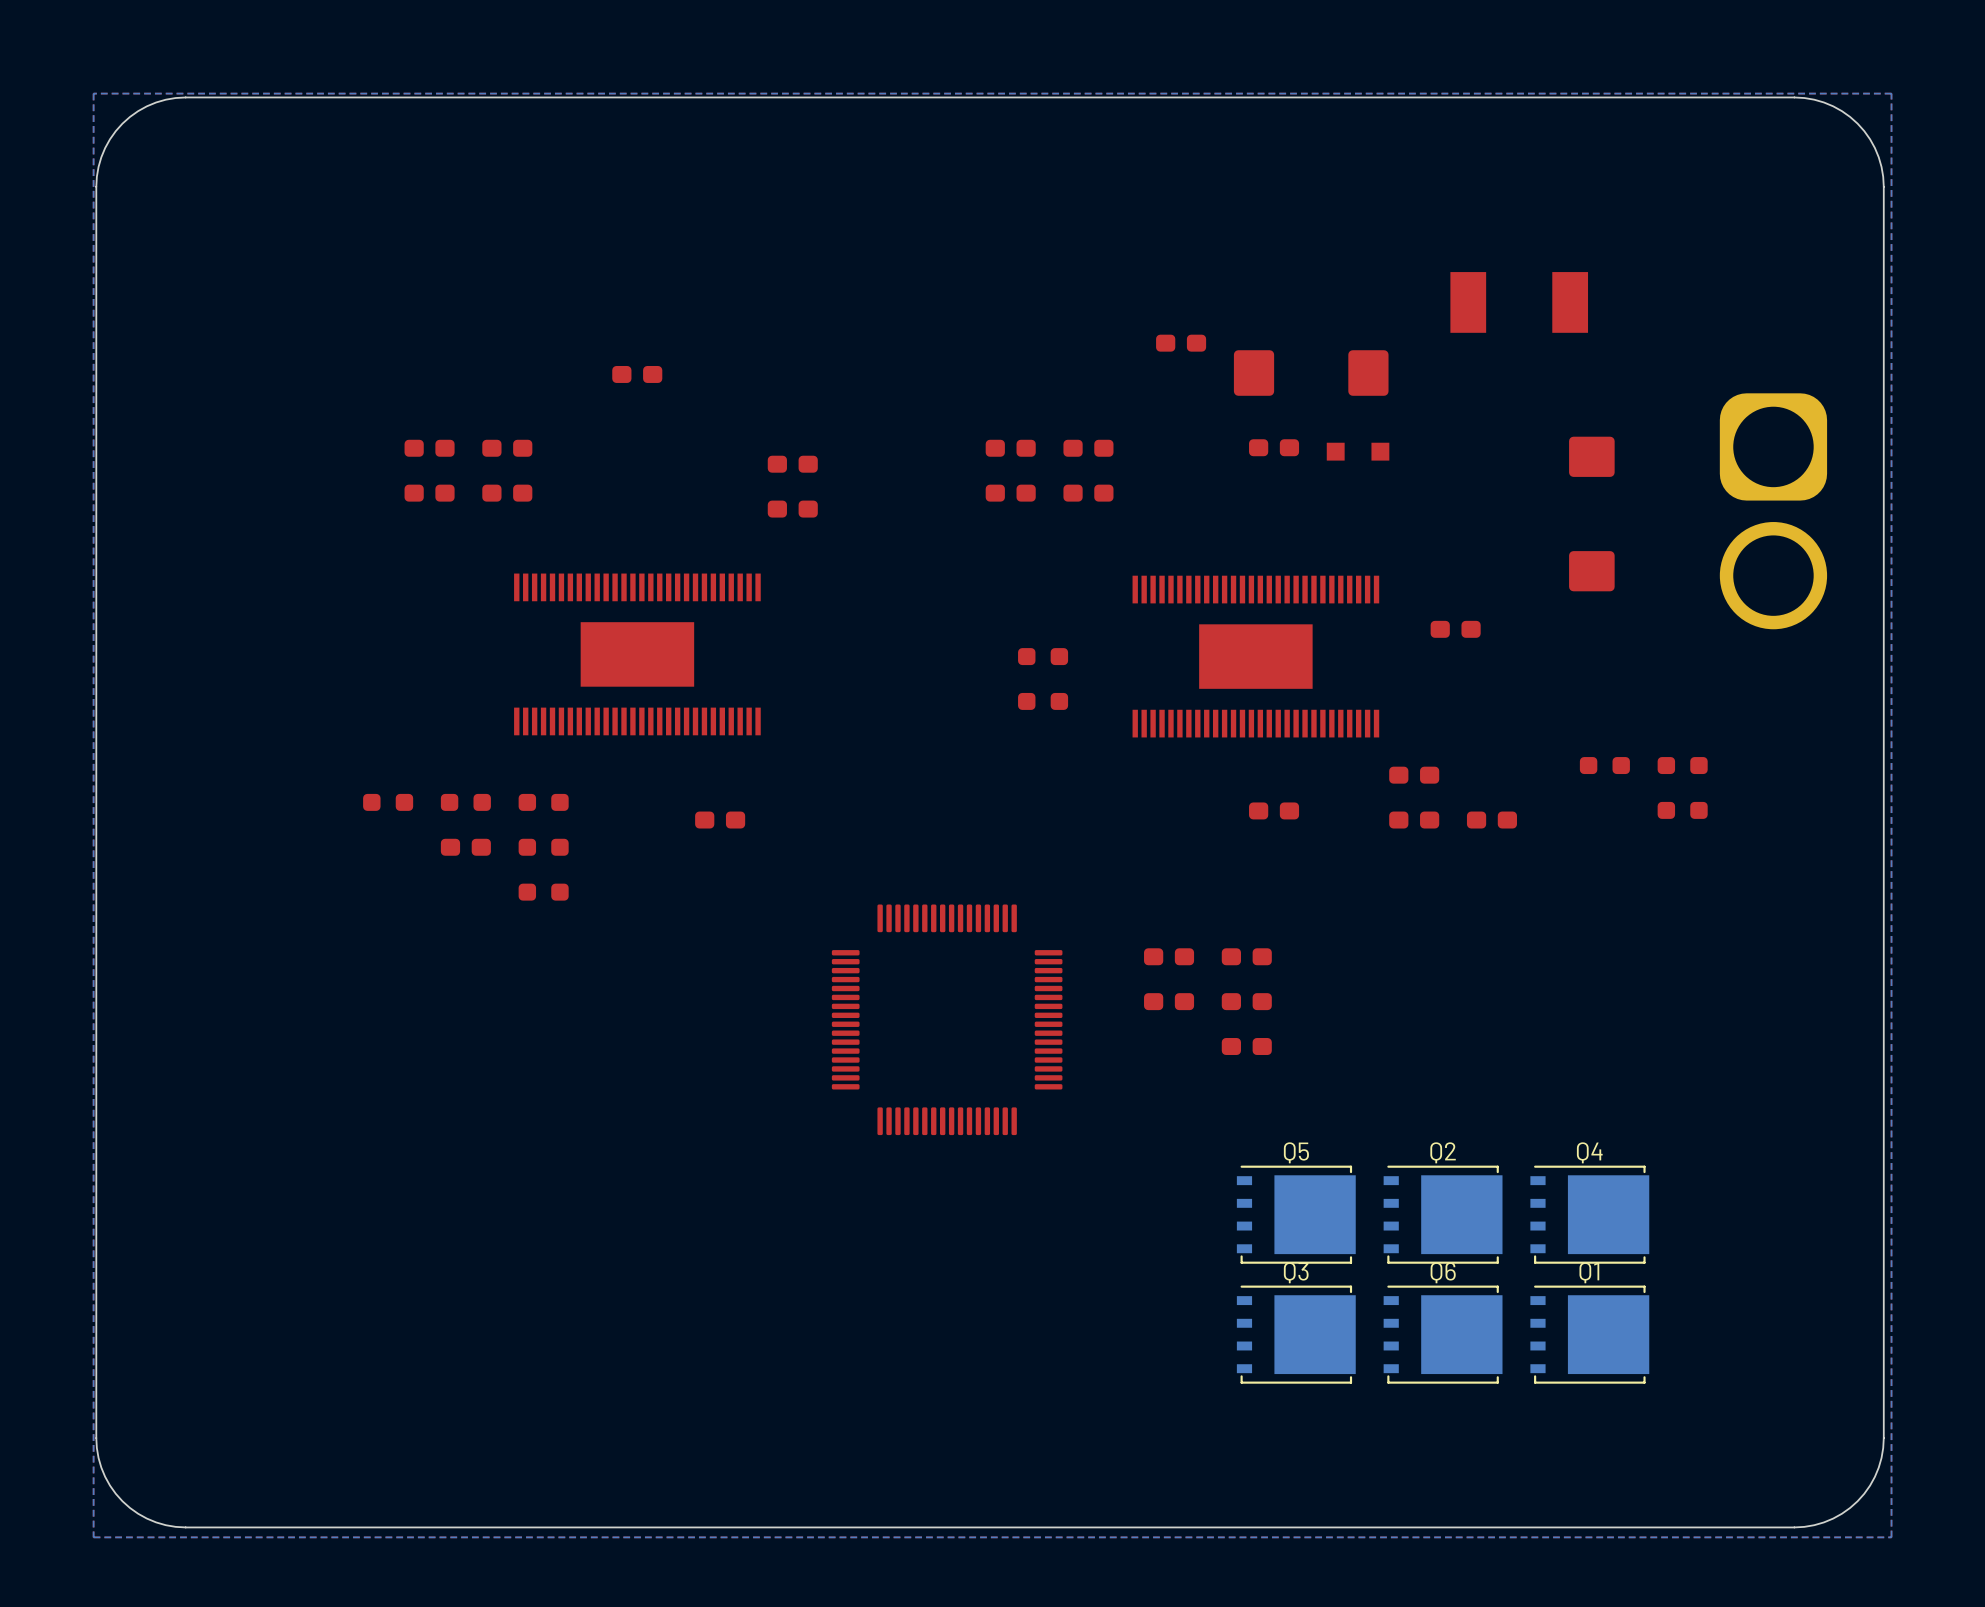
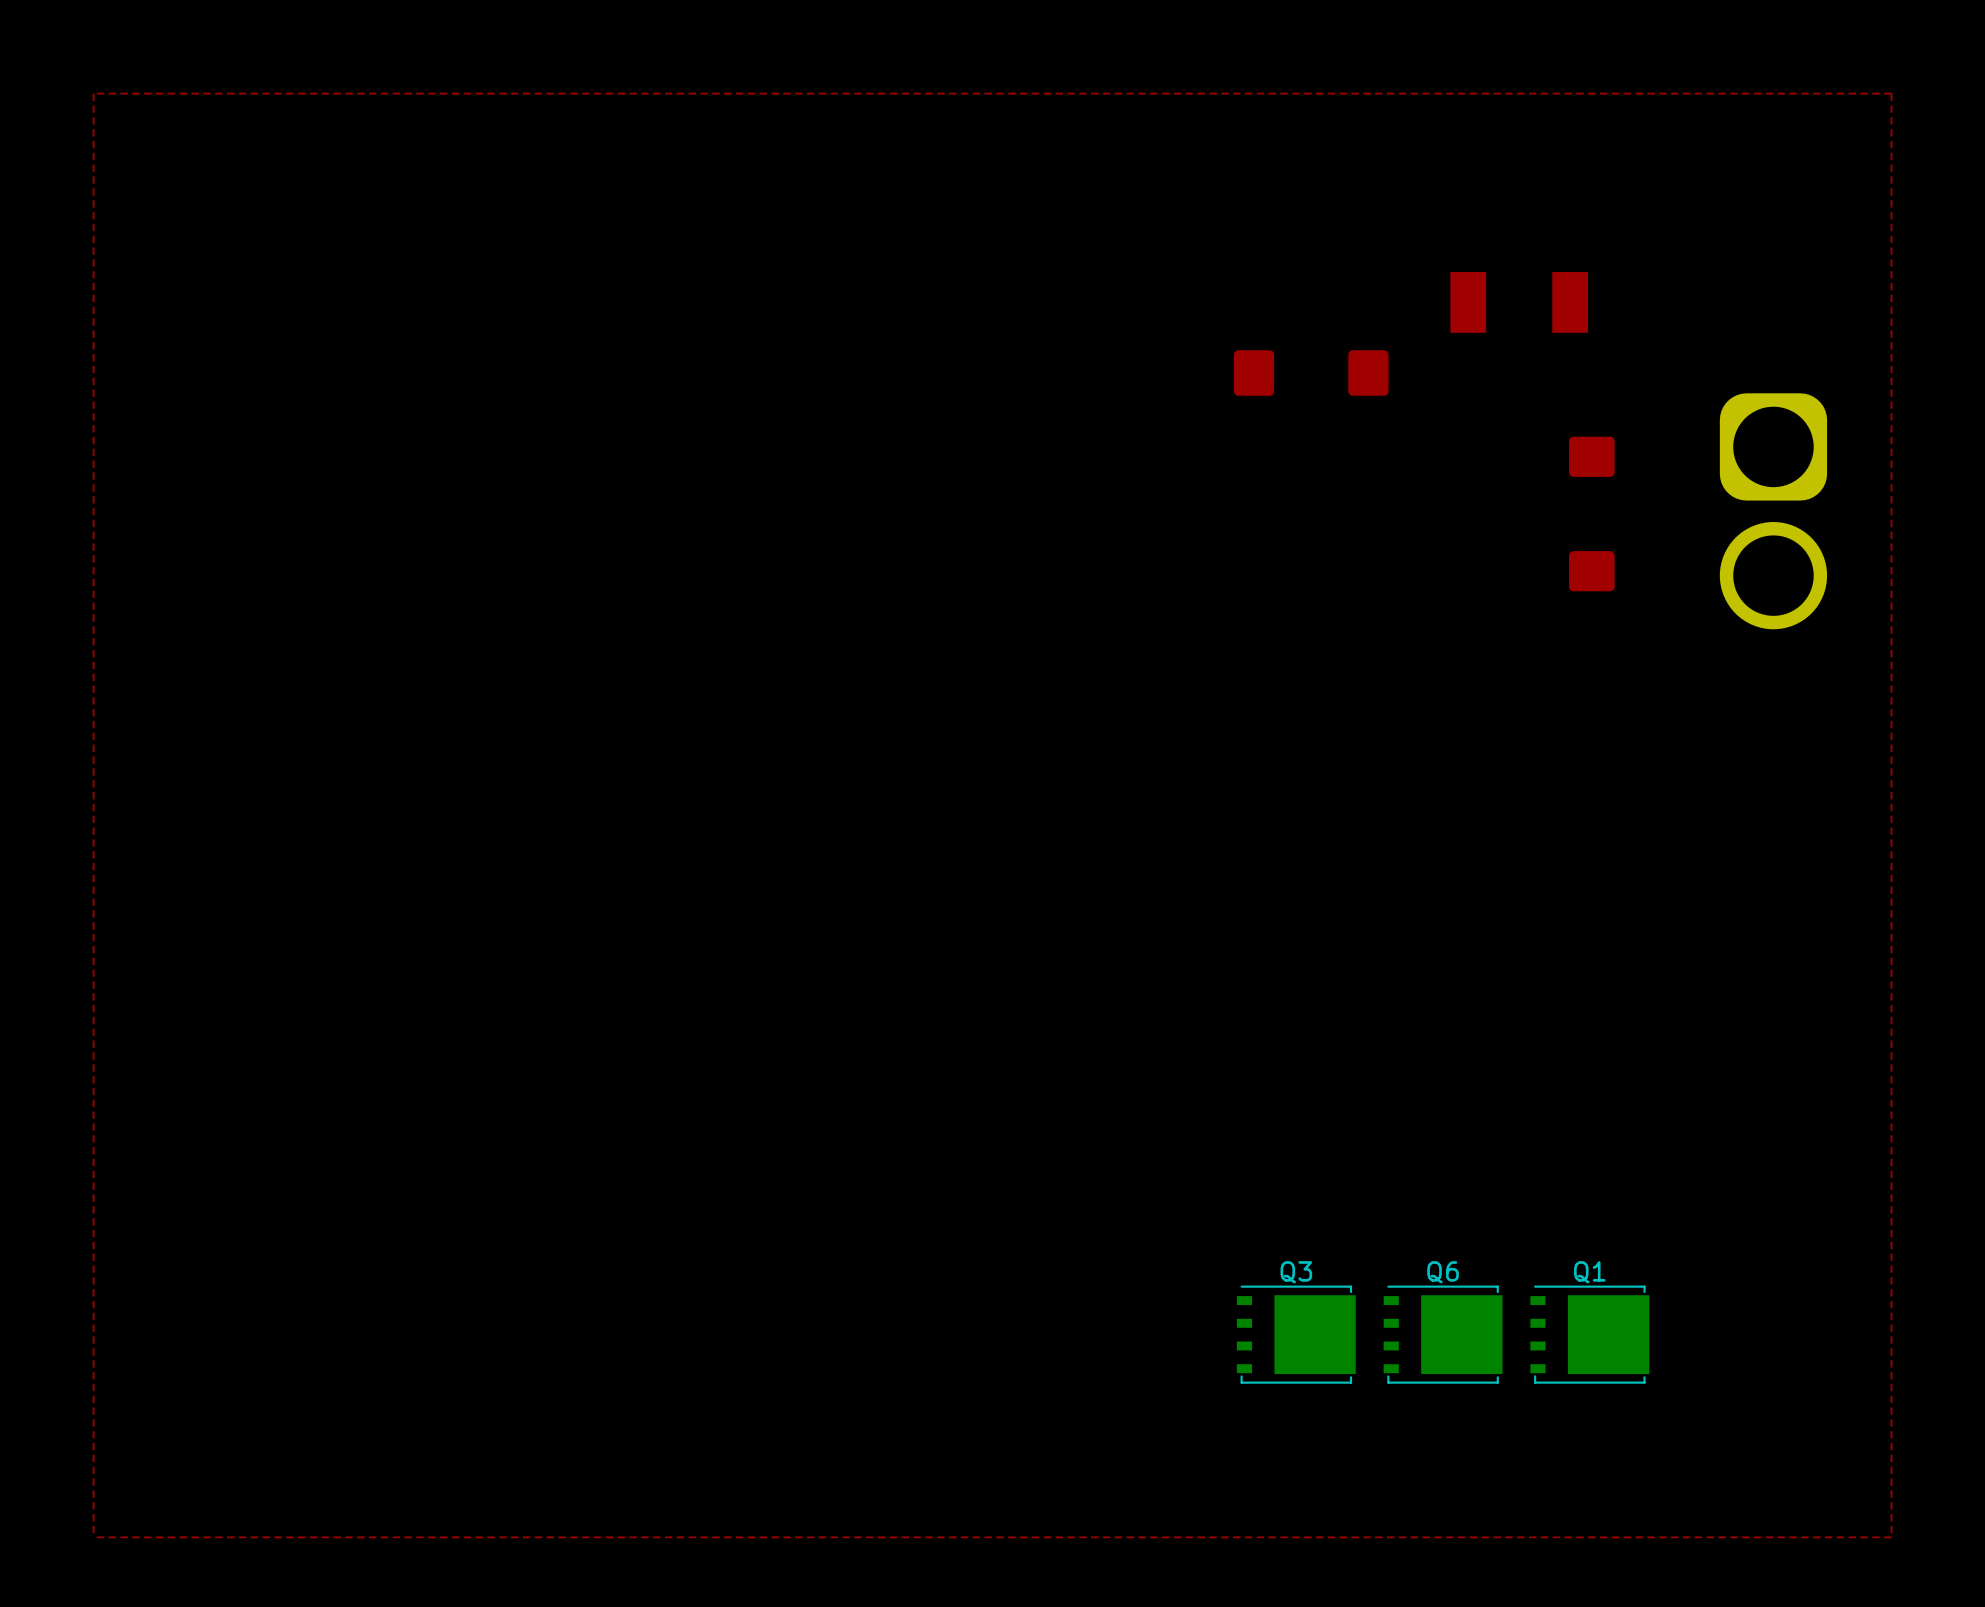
bottom zone outline: (1891, 93) (1891, 1537) (93, 1537) (93, 93) (1891, 93) -> none
board edge: (1794, 97) (185, 97) (156, 102) (129, 116) (115, 131) (105, 148) (98, 166) (96, 186) (96, 1438) (101, 1467) (115, 1493) (129, 1507) (146, 1518) (165, 1525) (185, 1527) (1794, 1527) (1823, 1522) (1850, 1507) (1864, 1493) (1874, 1476) (1881, 1457) (1883, 1438) (1883, 186) (1878, 157) (1870, 139) (1857, 123) (1833, 106) (1814, 99) (1794, 97) -> none
part: (1181, 343) -> none
part: (637, 374) -> none
part: (1274, 447) -> none
part: (429, 448) -> none
part: (507, 448) -> none
part: (1010, 448) -> none
part: (1088, 448) -> none
part: (1358, 451) -> none
part: (792, 464) -> none
part: (429, 493) -> none
part: (507, 493) -> none
part: (1010, 493) -> none
part: (1088, 493) -> none
part: (792, 509) -> none
part: (1455, 629) -> none
part: (637, 654) -> none
part: (1043, 656) -> none
part: (1255, 656) -> none
part: (1043, 701) -> none
part: (1604, 765) -> none
part: (1682, 765) -> none
part: (1414, 775) -> none
part: (388, 802) -> none
part: (465, 802) -> none
part: (543, 802) -> none
part: (1274, 810) -> none
part: (1682, 810) -> none
part: (720, 820) -> none
part: (1414, 820) -> none
part: (1491, 820) -> none
part: (465, 847) -> none
part: (543, 847) -> none
part: (543, 892) -> none
part: (1169, 956) -> none
part: (1246, 956) -> none
part: (1169, 1001) -> none
part: (1246, 1001) -> none
part: (947, 1019) -> none
part: (1246, 1046) -> none
Q5: (1296, 1214) -> none
Q2: (1443, 1214) -> none
Q4: (1589, 1214) -> none

